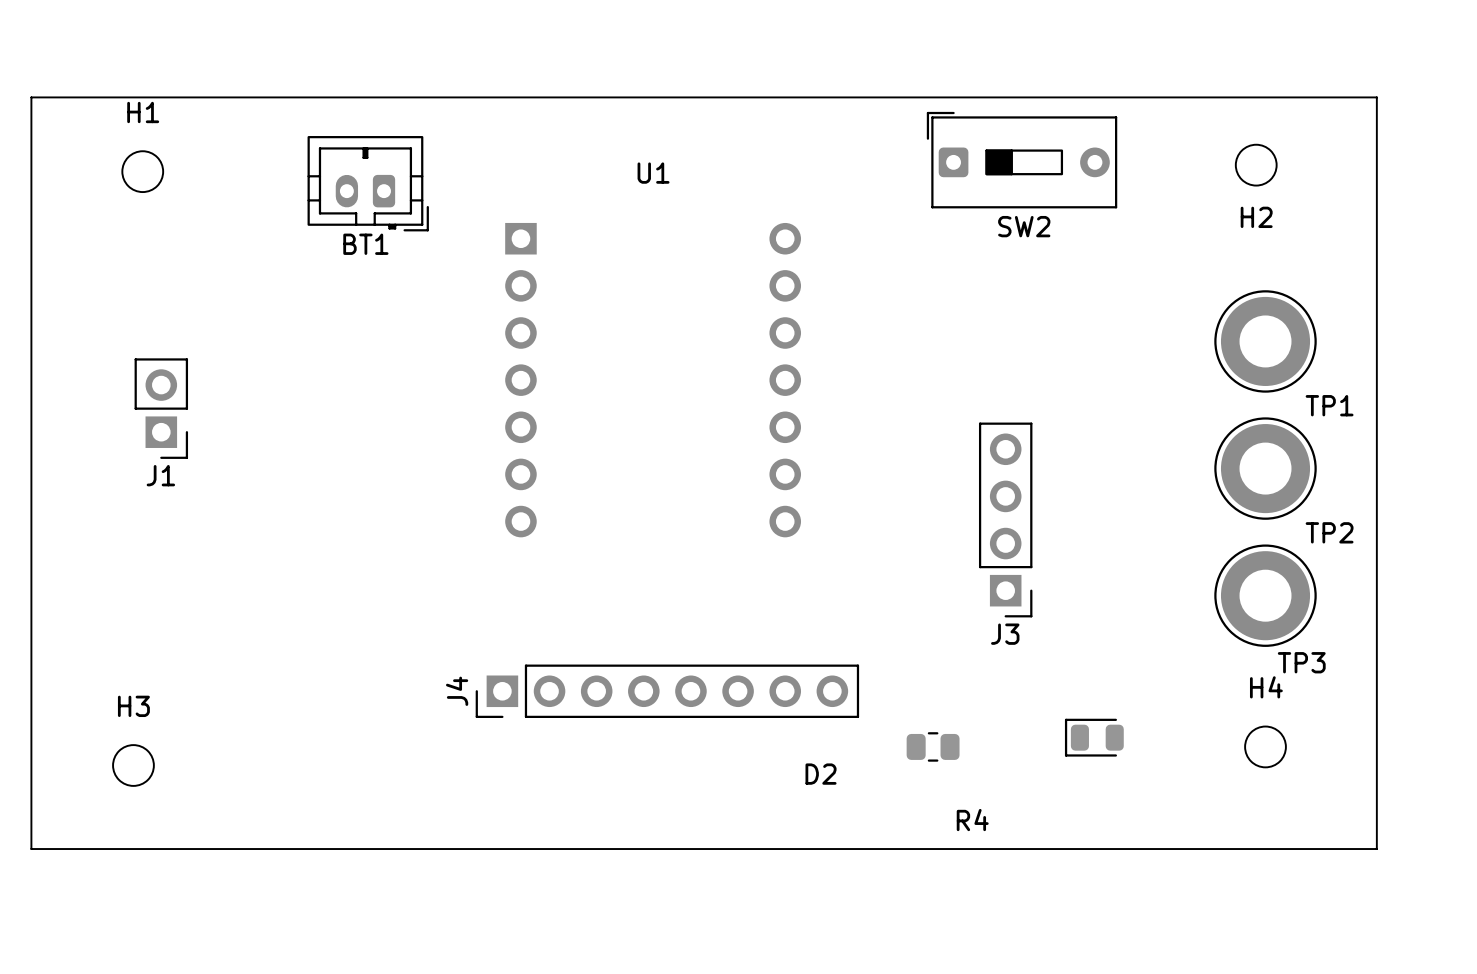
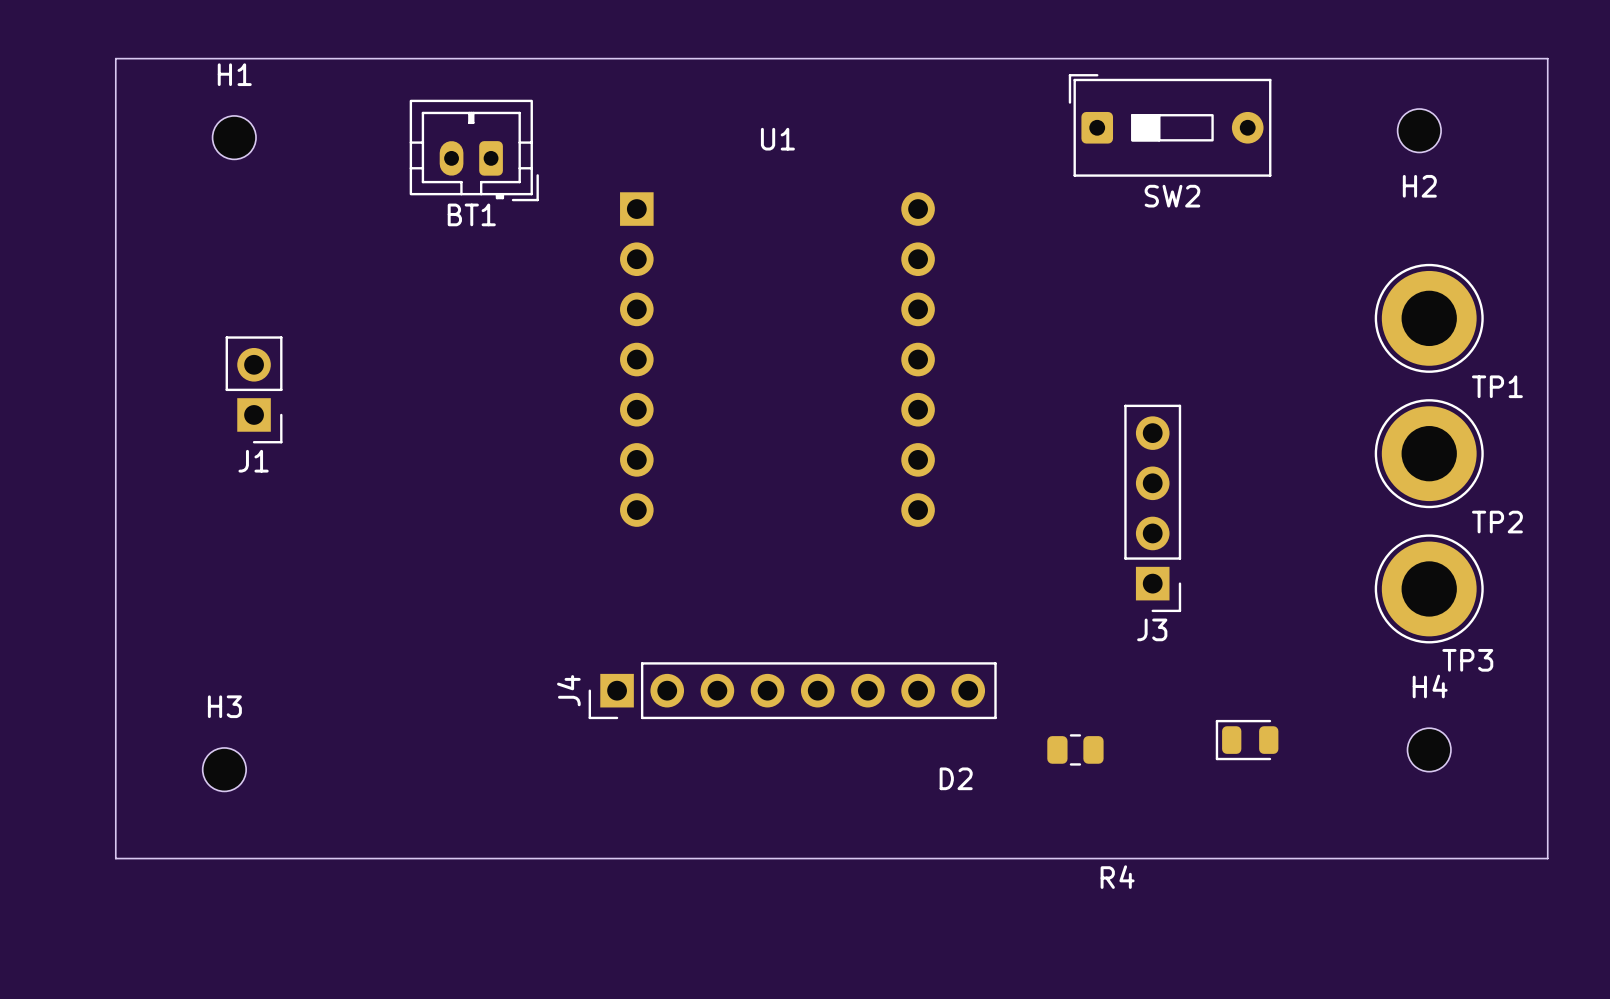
R4 name position: R4 (972, 820) -> R4 (1117, 877)

